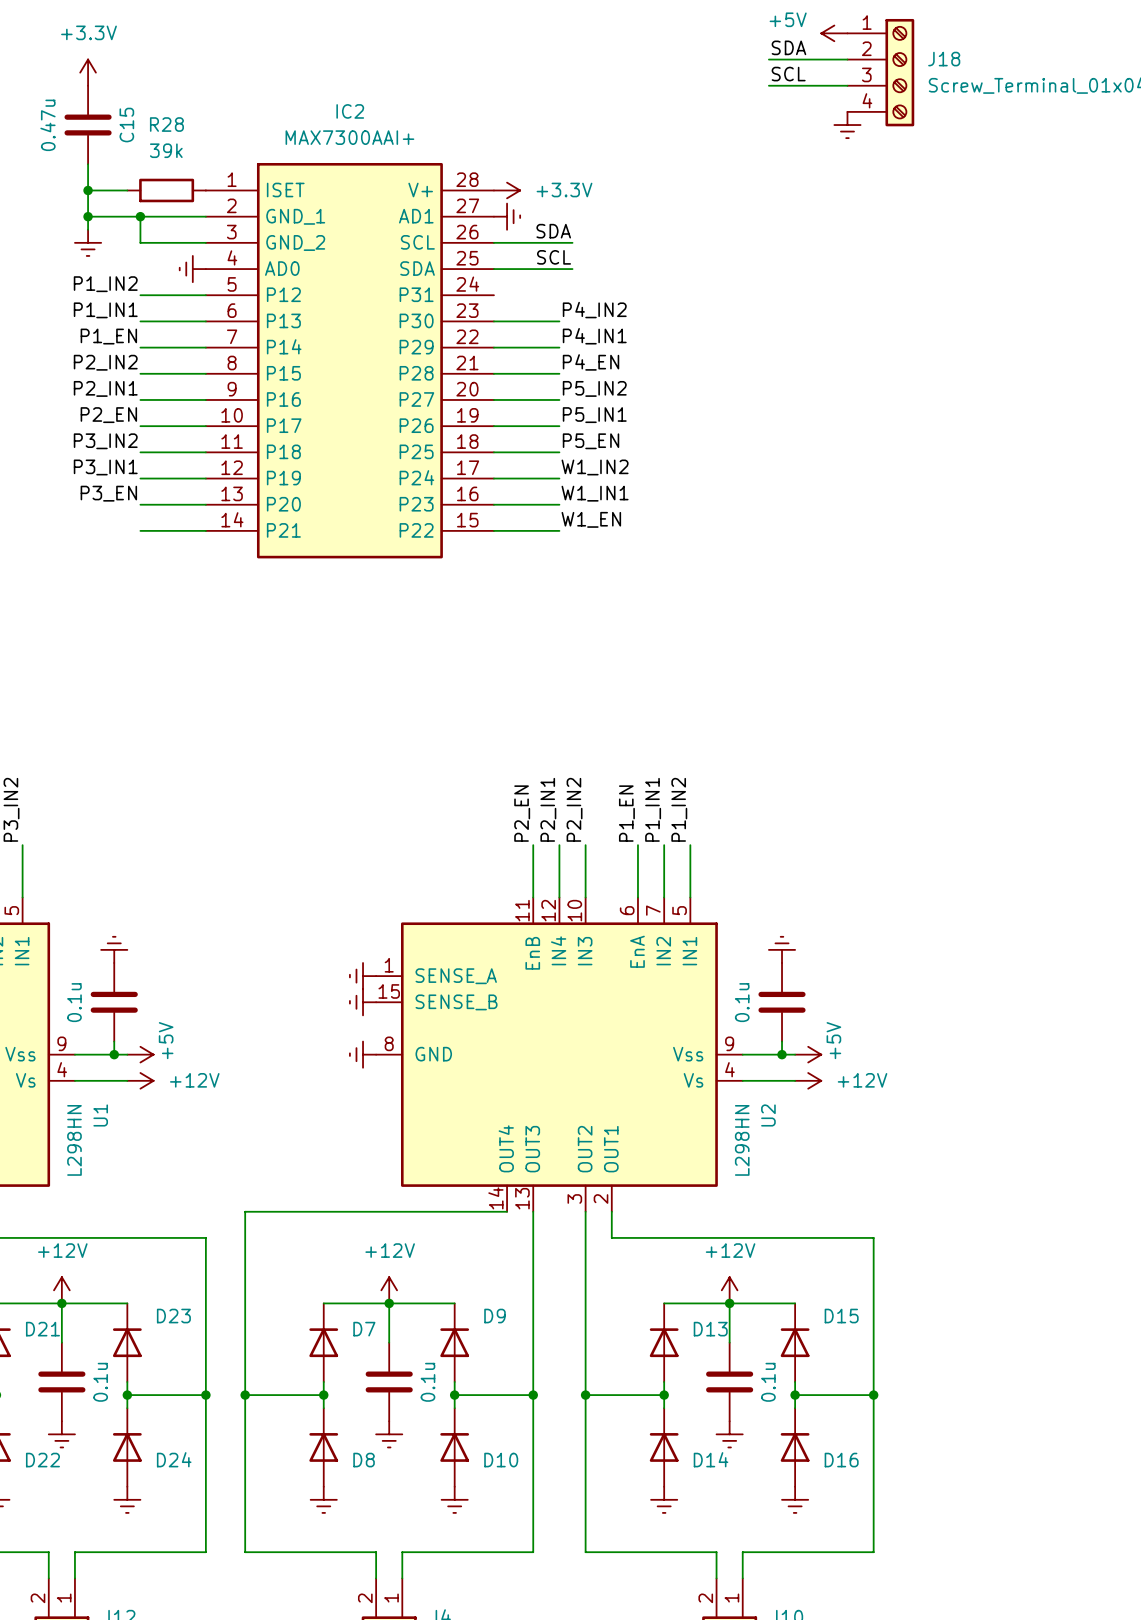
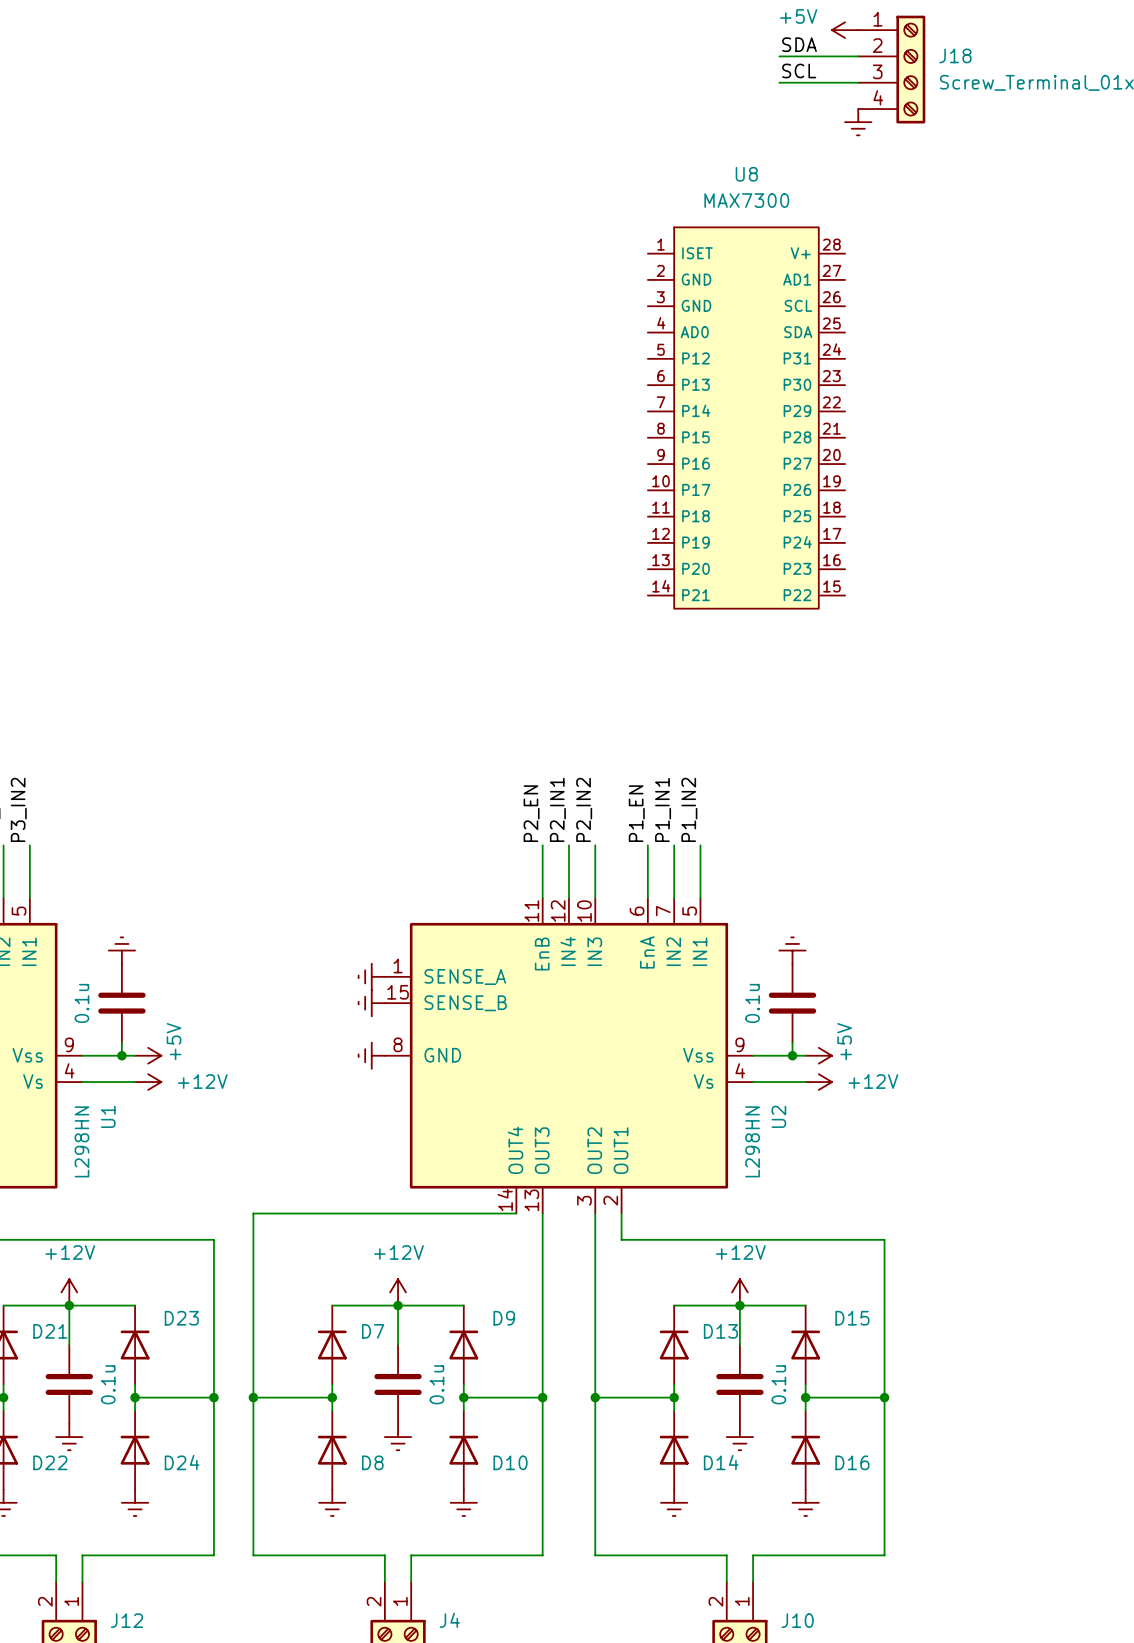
power symbol: +3.3V (88, 72) -> none
C15: 0.47u (88, 125) -> none
wire: (88, 164) (88, 229) -> none
wire: (88, 190) (127, 190) -> none
junction: (88, 190) -> none
R28: 39k (166, 190) -> none
power symbol: +3.3V (507, 190) -> none
wire: (88, 216) (205, 216) -> none
junction: (88, 216) -> none
wire: (140, 216) (140, 242) (205, 242) -> none
junction: (140, 216) -> none
power symbol: (507, 216) -> none
label: SDA (553, 231) -> none
power symbol: (88, 242) -> none
wire: (493, 242) (572, 242) -> none
label: SCL (554, 257) -> none
power symbol: (192, 269) -> none
wire: (493, 269) (572, 269) -> none
label: P1_IN2 (105, 284) -> none
wire: (140, 295) (205, 295) -> none
label: P1_IN1 (105, 310) -> none
label: P4_IN2 (594, 310) -> none
wire: (140, 321) (205, 321) -> none
wire: (493, 321) (559, 321) -> none
label: P1_EN (108, 336) -> none
label: P4_IN1 (594, 336) -> none
wire: (140, 347) (205, 347) -> none
wire: (493, 347) (559, 347) -> none
IC2: MAX7300AAI+ (349, 360) -> none
label: P2_IN2 (105, 362) -> none
label: P4_EN (591, 362) -> none
wire: (140, 373) (205, 373) -> none
wire: (493, 373) (559, 373) -> none
label: P2_IN1 (105, 388) -> none
label: P5_IN2 (594, 388) -> none
wire: (140, 399) (205, 399) -> none
wire: (493, 399) (559, 399) -> none
label: P2_EN (108, 415) -> none
label: P5_IN1 (594, 415) -> none
U8: none -> MAX7300 (746, 418)
wire: (140, 426) (205, 426) -> none
wire: (493, 426) (559, 426) -> none
label: P3_IN2 (105, 441) -> none
label: P5_EN (591, 441) -> none
wire: (140, 452) (205, 452) -> none
wire: (493, 452) (559, 452) -> none
label: P3_IN1 (105, 467) -> none
label: W1_IN2 (595, 467) -> none
wire: (140, 478) (205, 478) -> none
wire: (493, 478) (559, 478) -> none
label: P3_EN (108, 493) -> none
label: W1_IN1 (595, 493) -> none
wire: (140, 504) (205, 504) -> none
wire: (493, 504) (559, 504) -> none
label: W1_EN (591, 519) -> none
wire: (140, 530) (205, 530) -> none
wire: (493, 530) (559, 530) -> none

